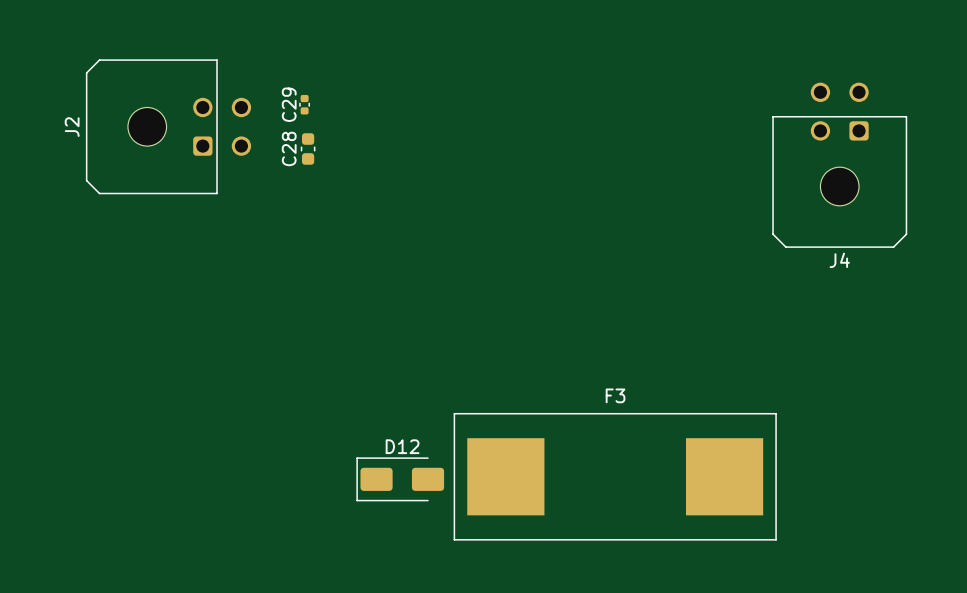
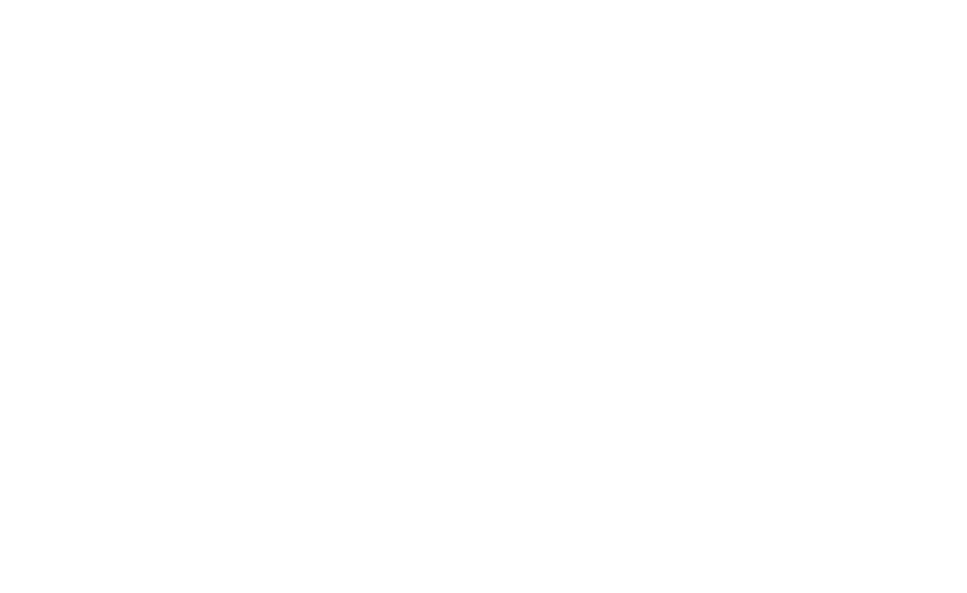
C29: (304, 104) -> none
J2: (168, 126) -> none
C28: (308, 148) -> none
J4: (839, 165) -> none
F3: (615, 476) -> none
D12: (400, 479) -> none

